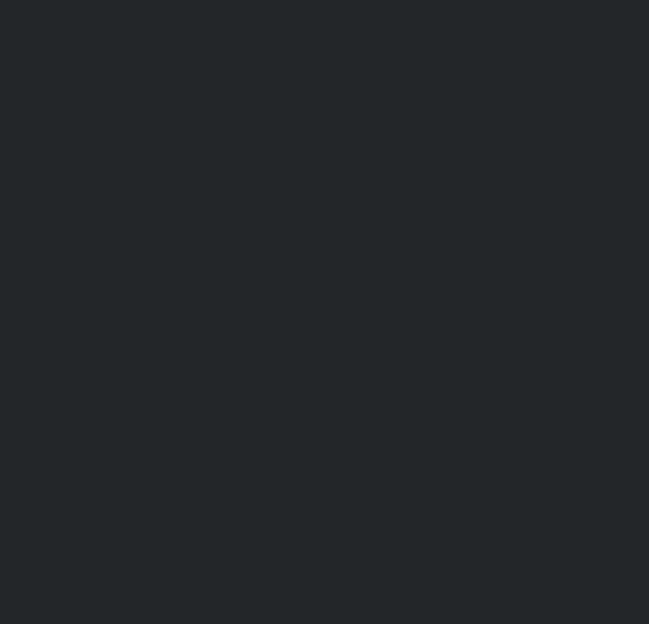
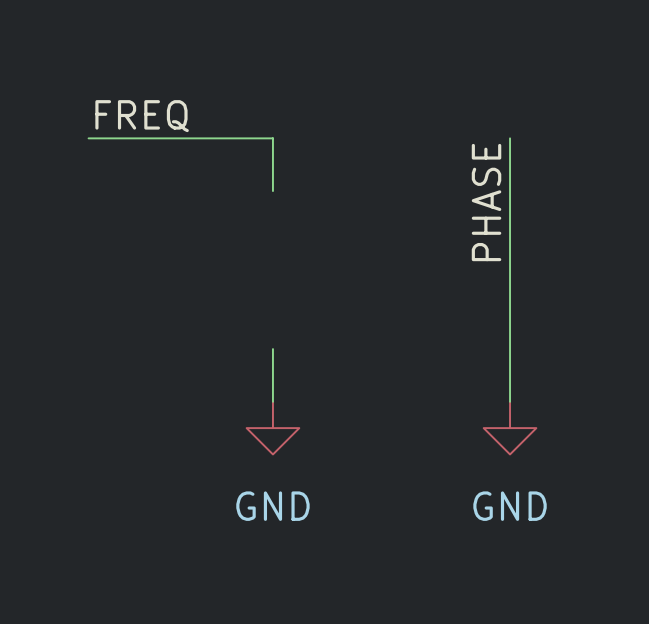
label: none -> FREQ (142, 116)
wire: none -> (88, 138) (272, 138) (272, 191)
wire: none -> (510, 138) (510, 401)
label: none -> PHASE (486, 202)
wire: none -> (272, 349) (272, 401)
power symbol: none -> GND (272, 428)
power symbol: none -> GND (510, 428)

